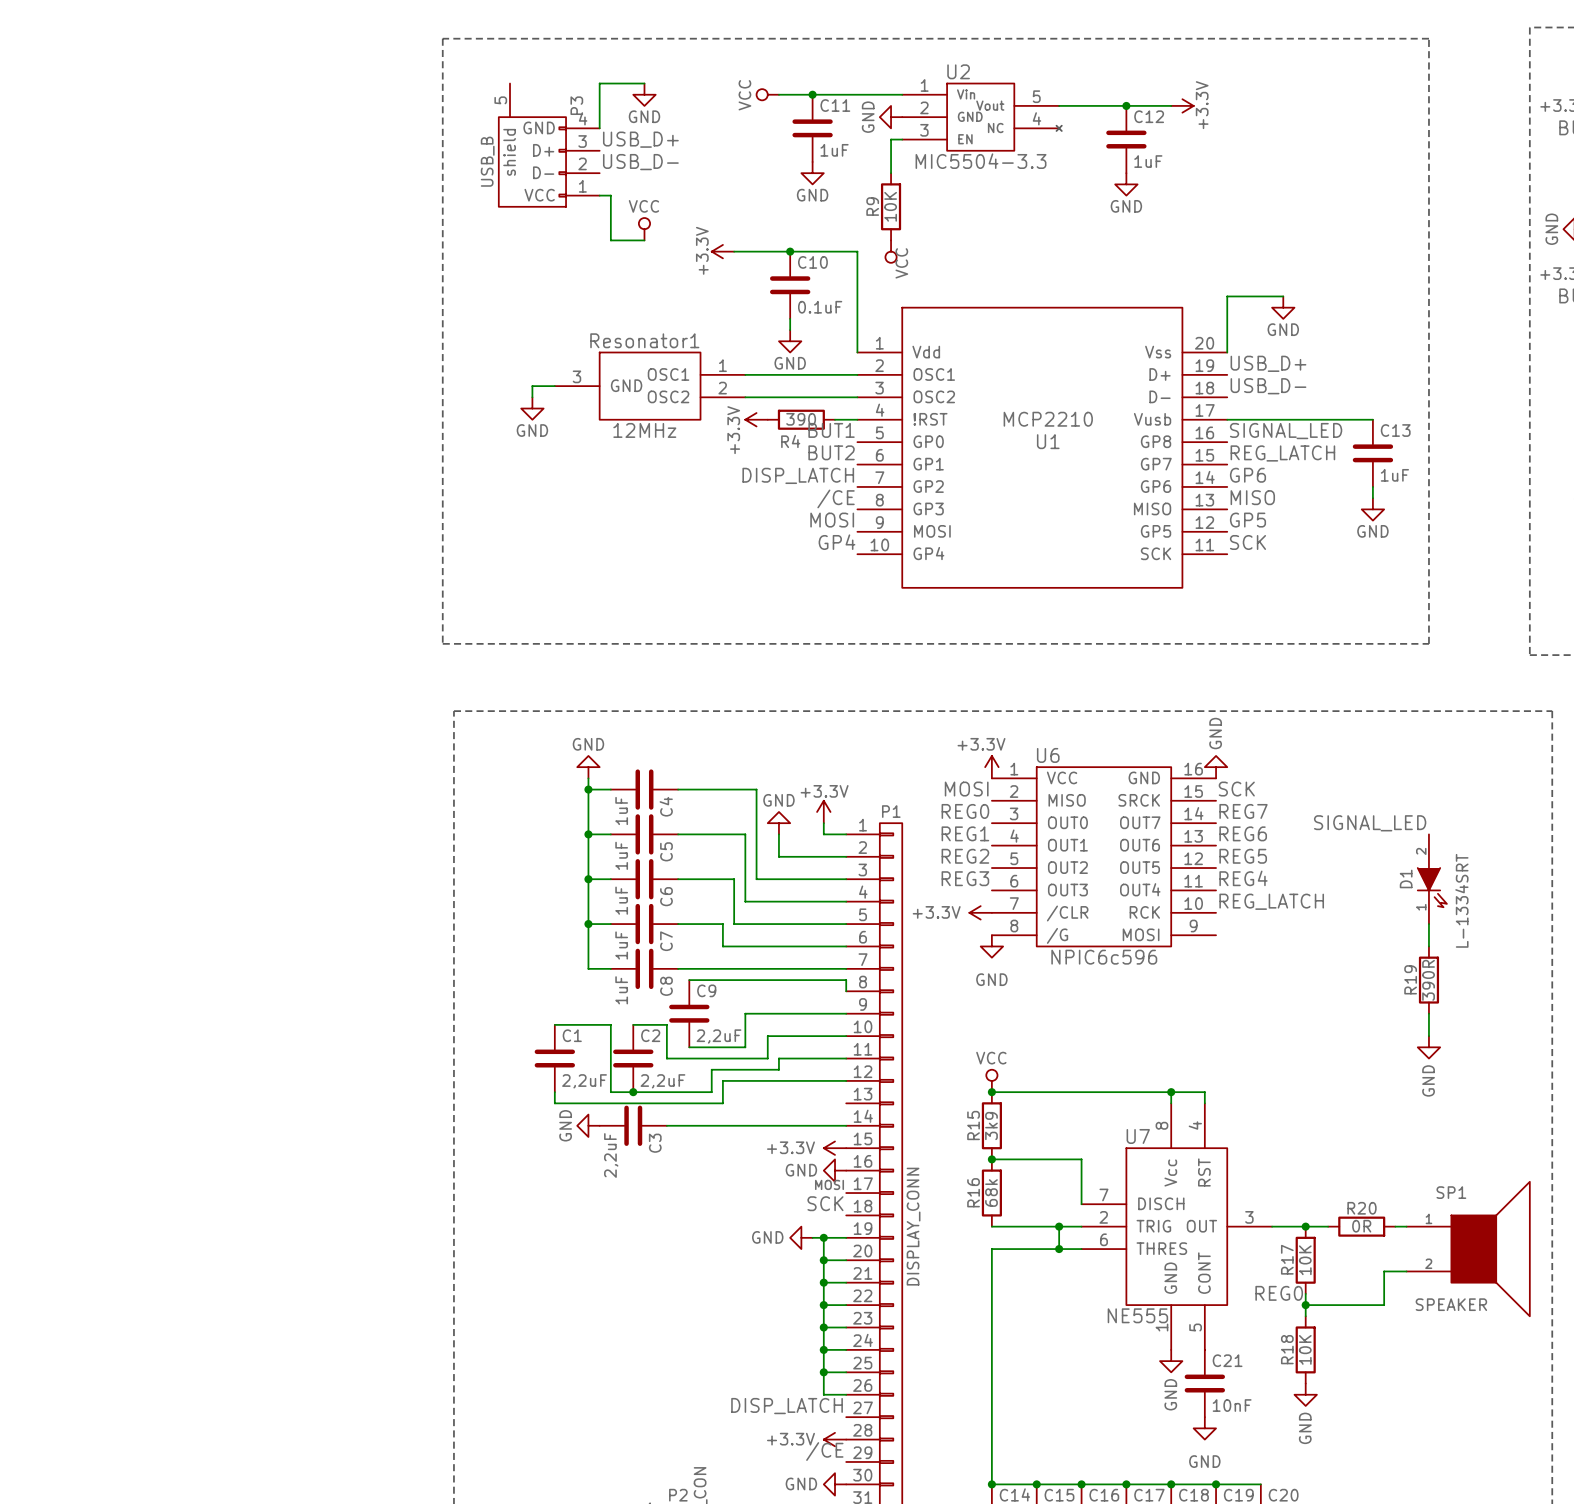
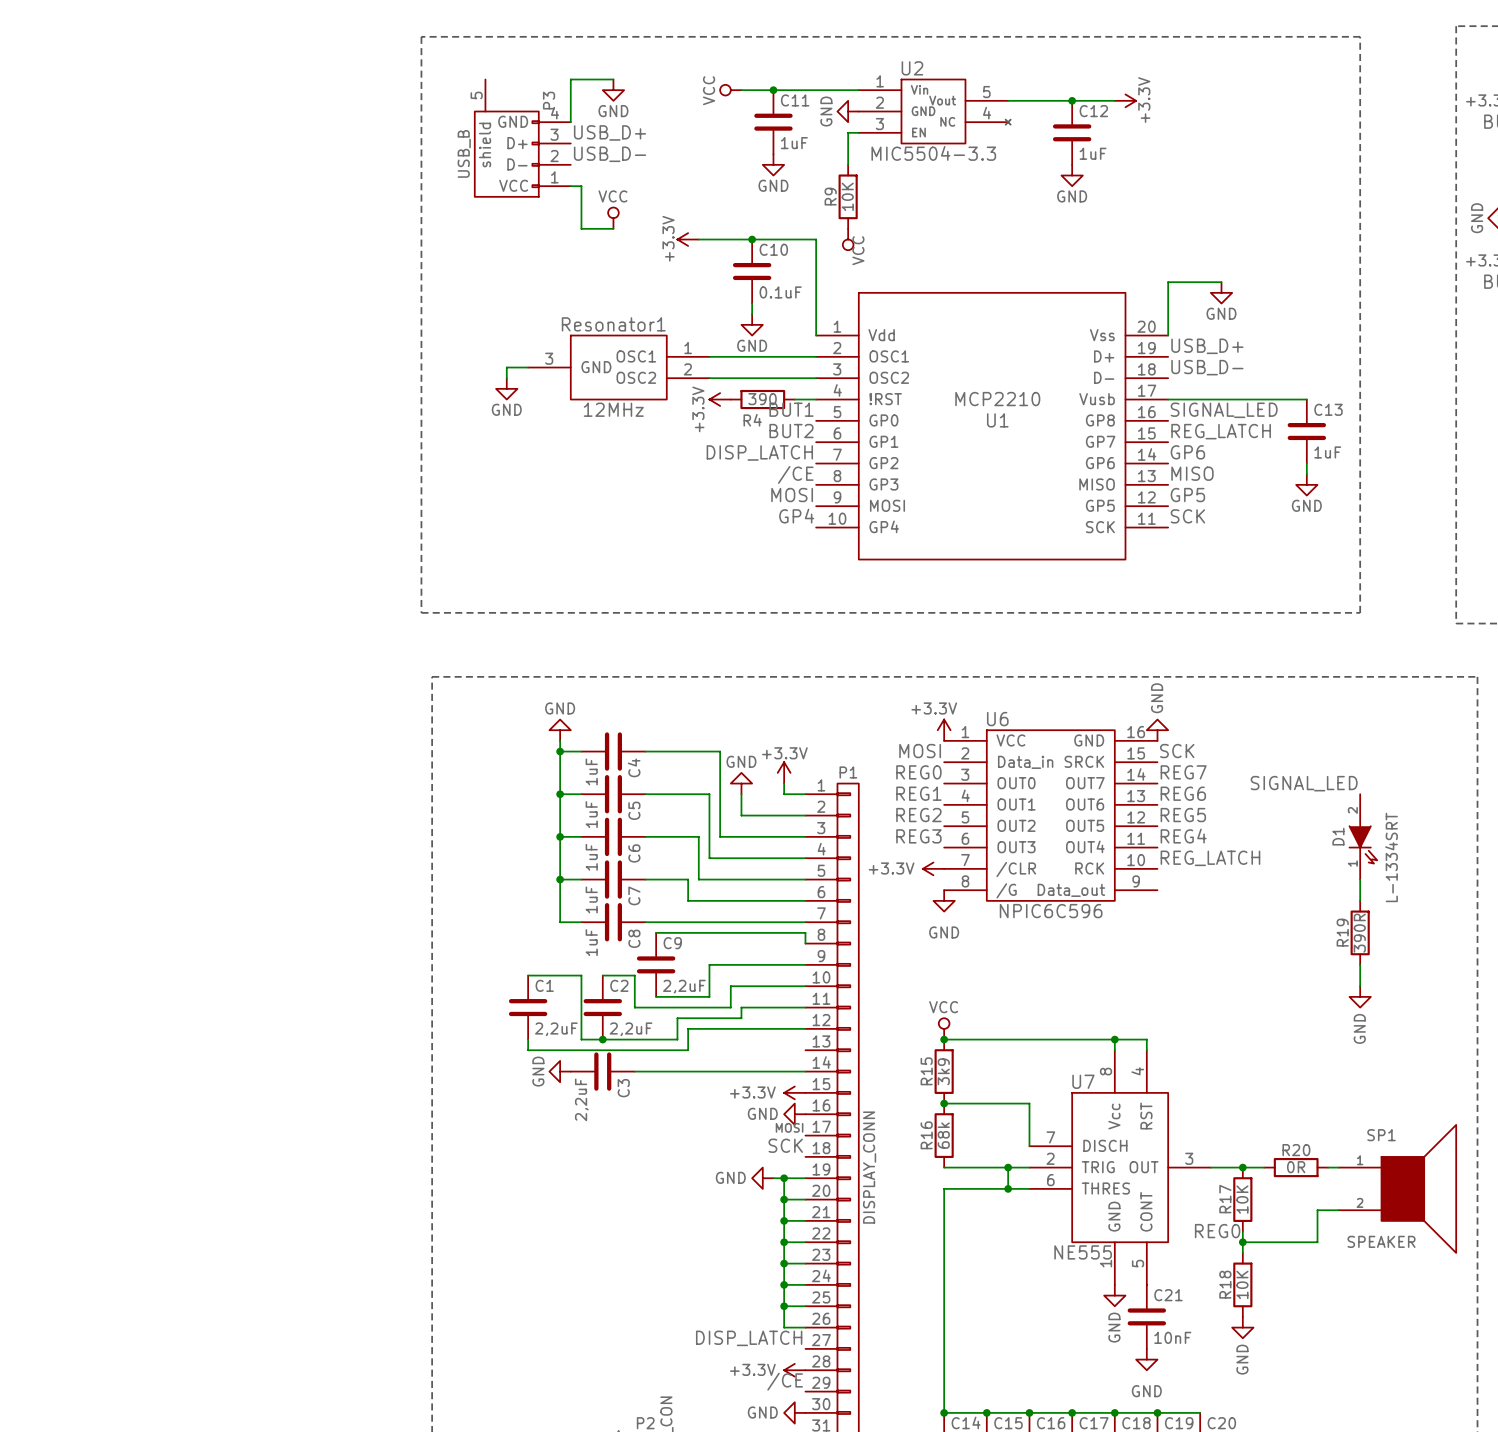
U6 pin name: MISO (1067, 800) -> Data_in (1025, 762)
U6 pin name: MOSI (1141, 934) -> Data_out (1071, 890)
U6 value: NPIC6c596 (1104, 957) -> NPIC6C596 (1051, 911)

